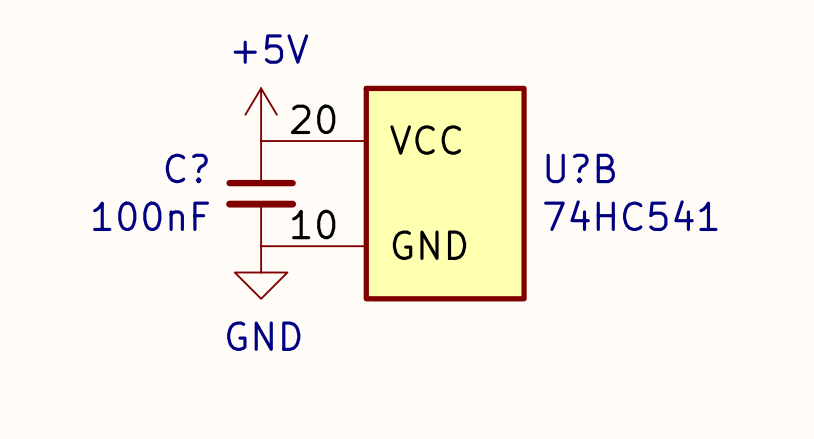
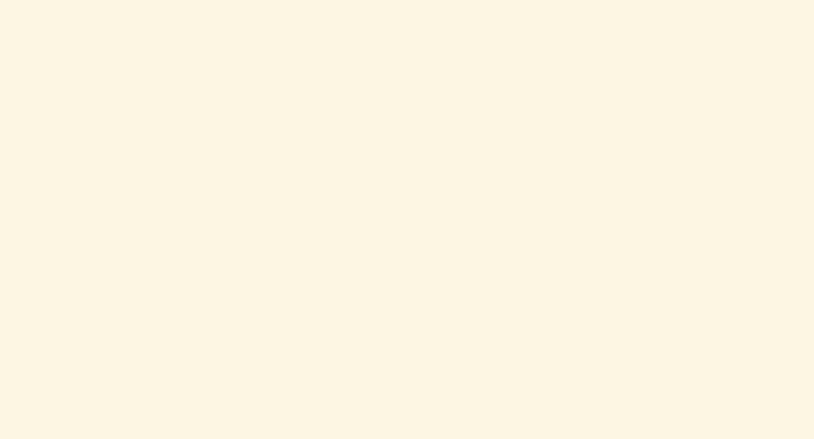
power symbol: +5V (261, 114) -> none
C?: 100nF (261, 193) -> none
U?B: 74HC541 (393, 193) -> none
power symbol: GND (261, 272) -> none

